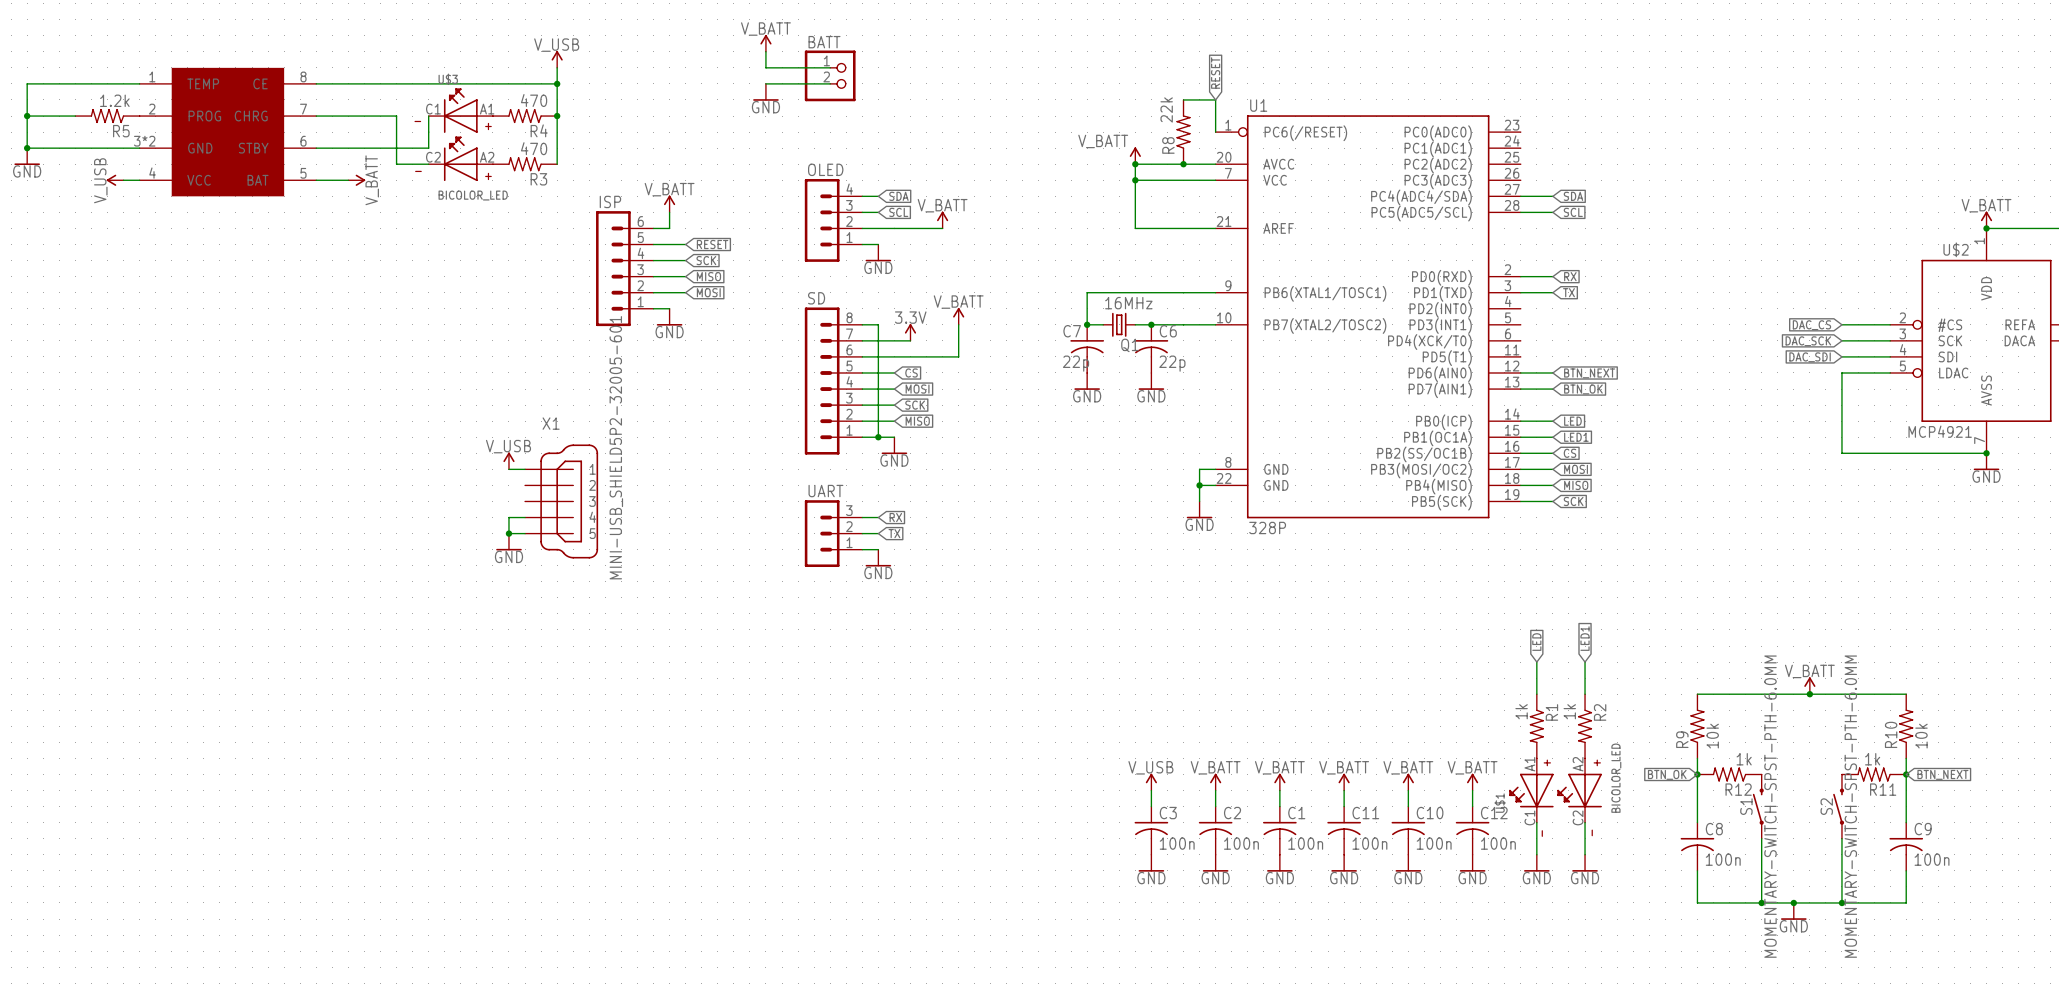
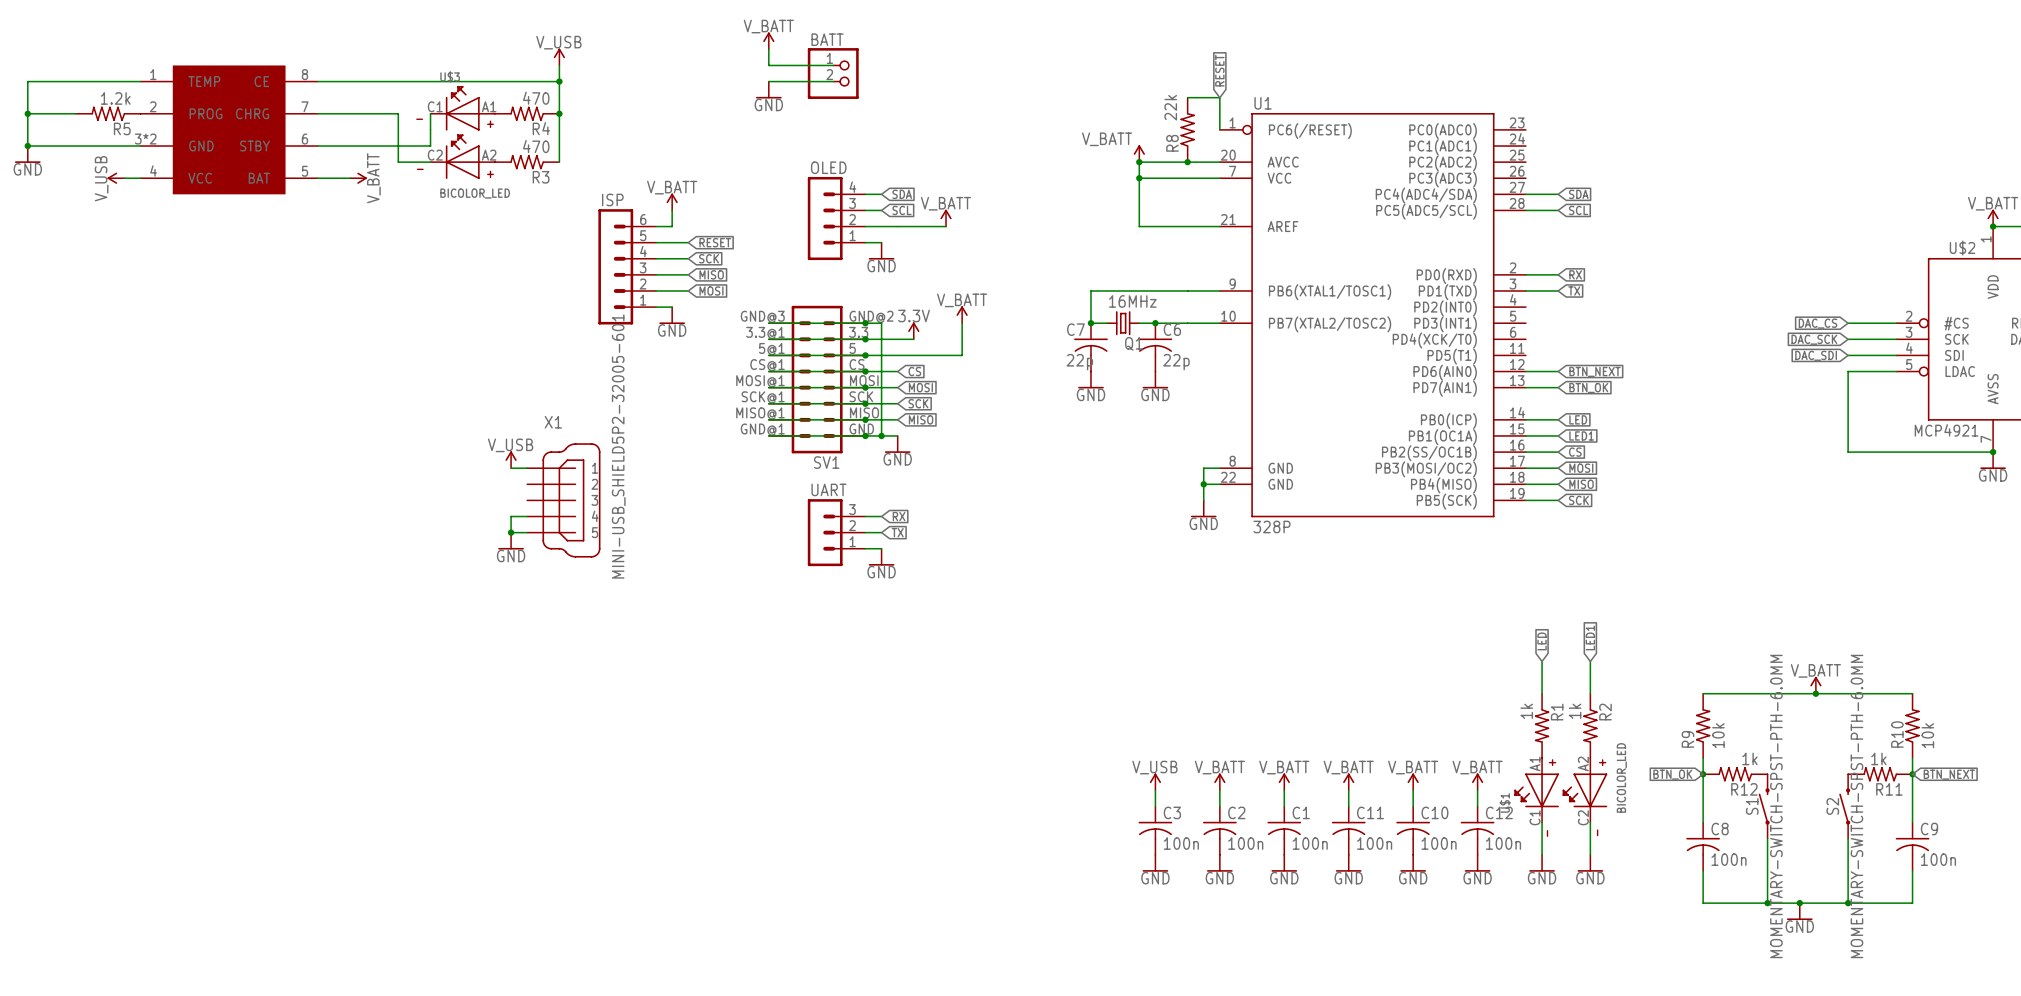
wire: none -> (768, 323) (865, 323)
junction: none -> (865, 323)
wire: none -> (768, 339) (865, 339)
junction: none -> (865, 339)
wire: none -> (768, 355) (865, 355)
junction: none -> (865, 355)
wire: none -> (768, 371) (865, 371)
junction: none -> (865, 371)
SV1: none -> (817, 379)
SD: (833, 381) -> none
wire: none -> (768, 387) (865, 387)
junction: none -> (865, 387)
wire: none -> (768, 403) (865, 403)
junction: none -> (865, 403)
wire: none -> (768, 419) (865, 419)
junction: none -> (865, 419)
wire: none -> (768, 435) (865, 435)
junction: none -> (865, 435)

